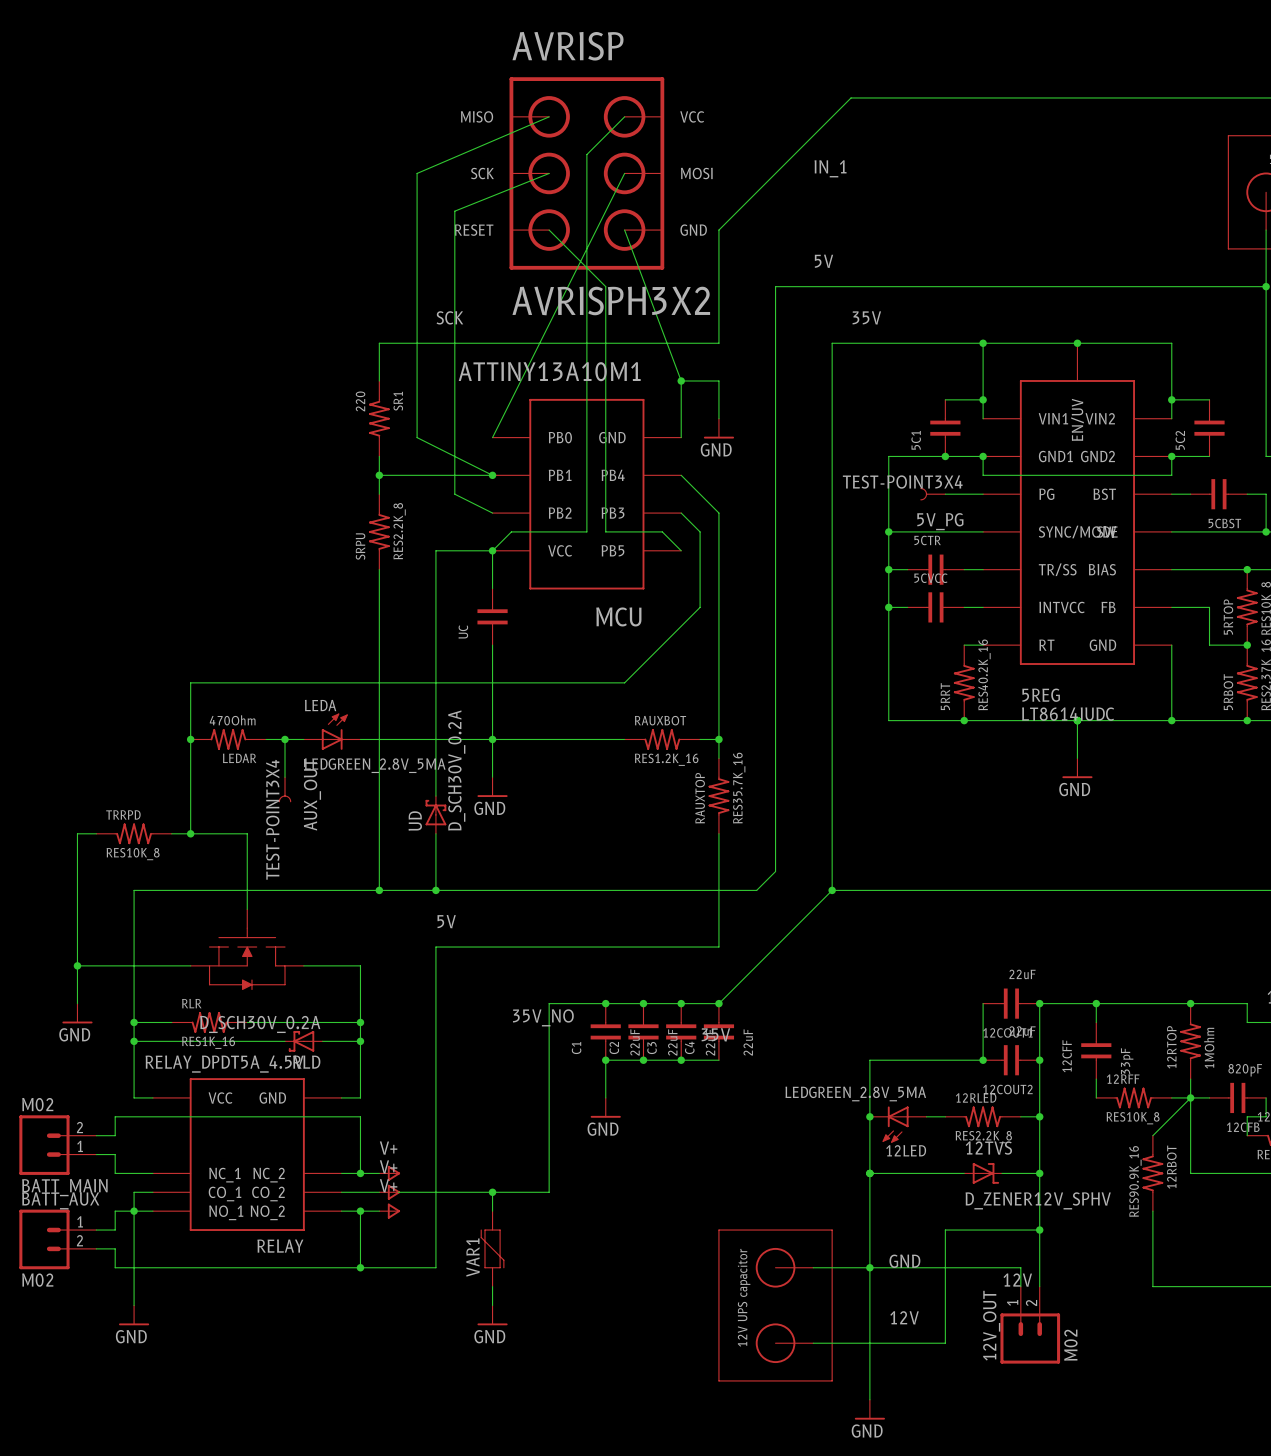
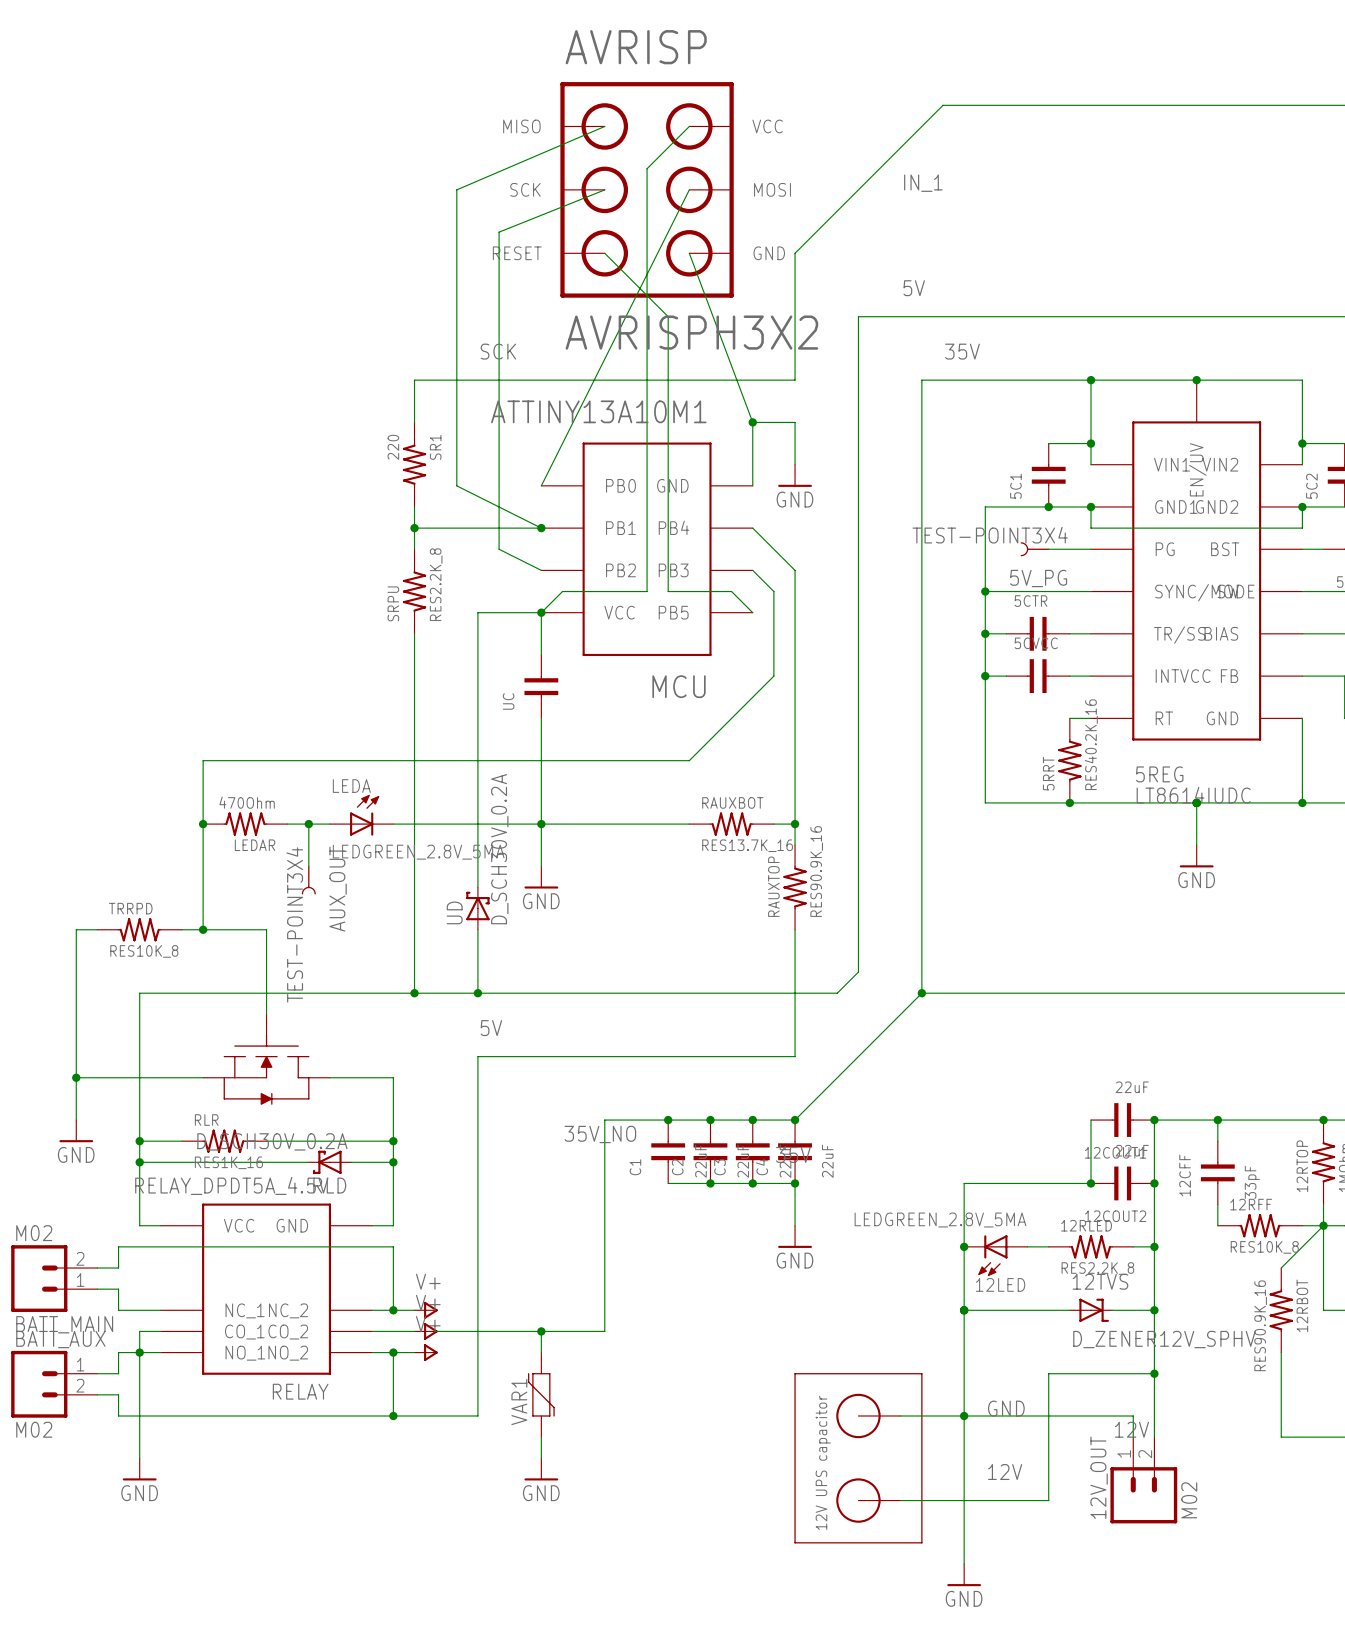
RAUXBOT value: RES1.2K_16 (666, 759) -> RES13.7K_16 (747, 845)
RAUXTOP value: RES35.7K_16 (739, 788) -> RES90.9K_16 (816, 871)
wire: (605, 1060) (605, 1097) -> (795, 1183) (795, 1225)
junction: (605, 1060) -> none
junction: none -> (795, 1183)
power symbol position: GND (605, 1107) -> GND (795, 1236)

